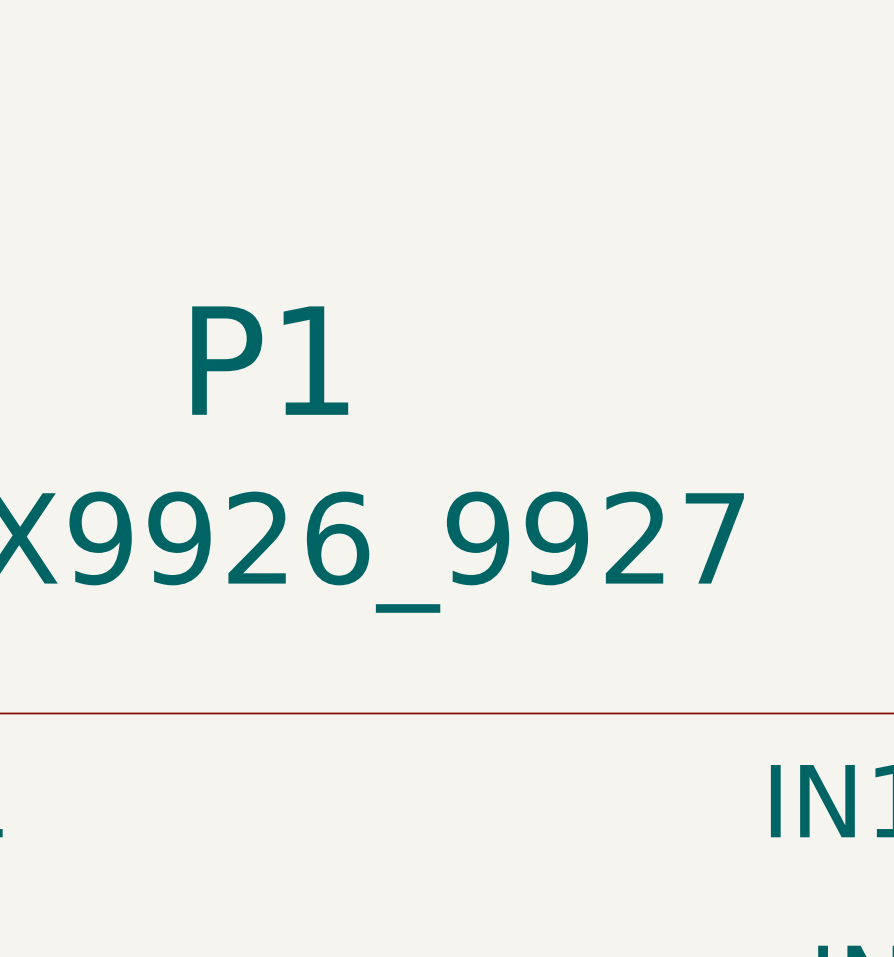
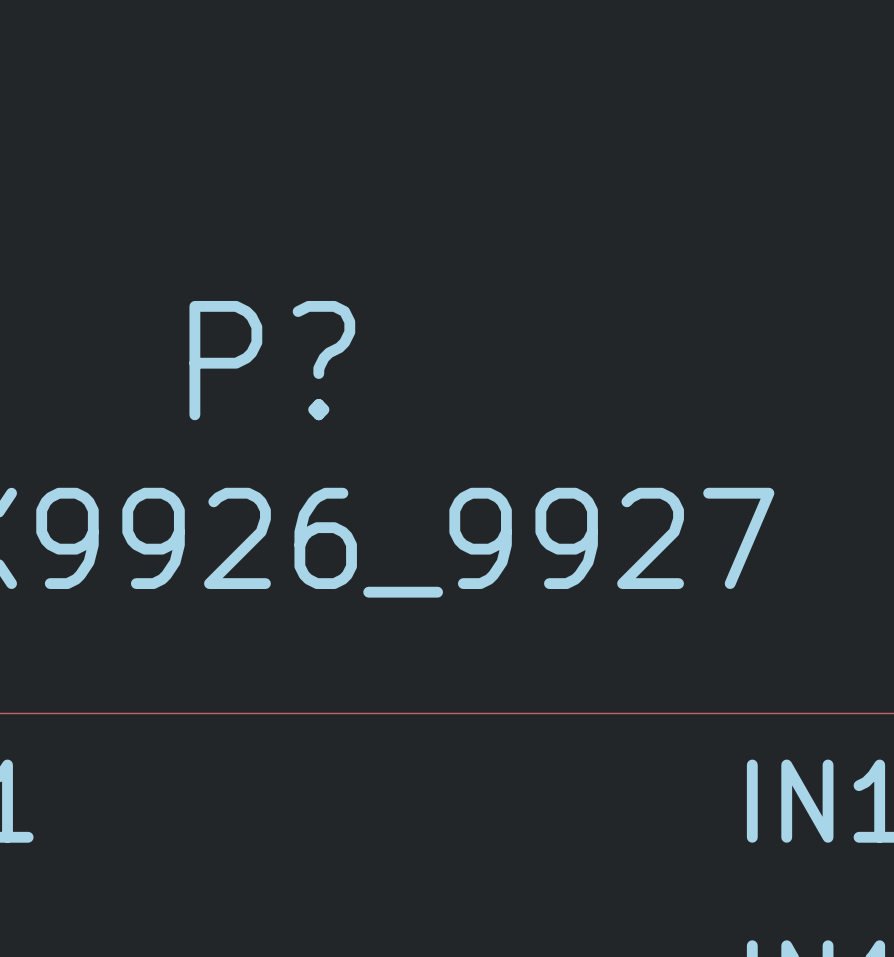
P1 name: P1 (270, 360) -> P? (272, 360)

